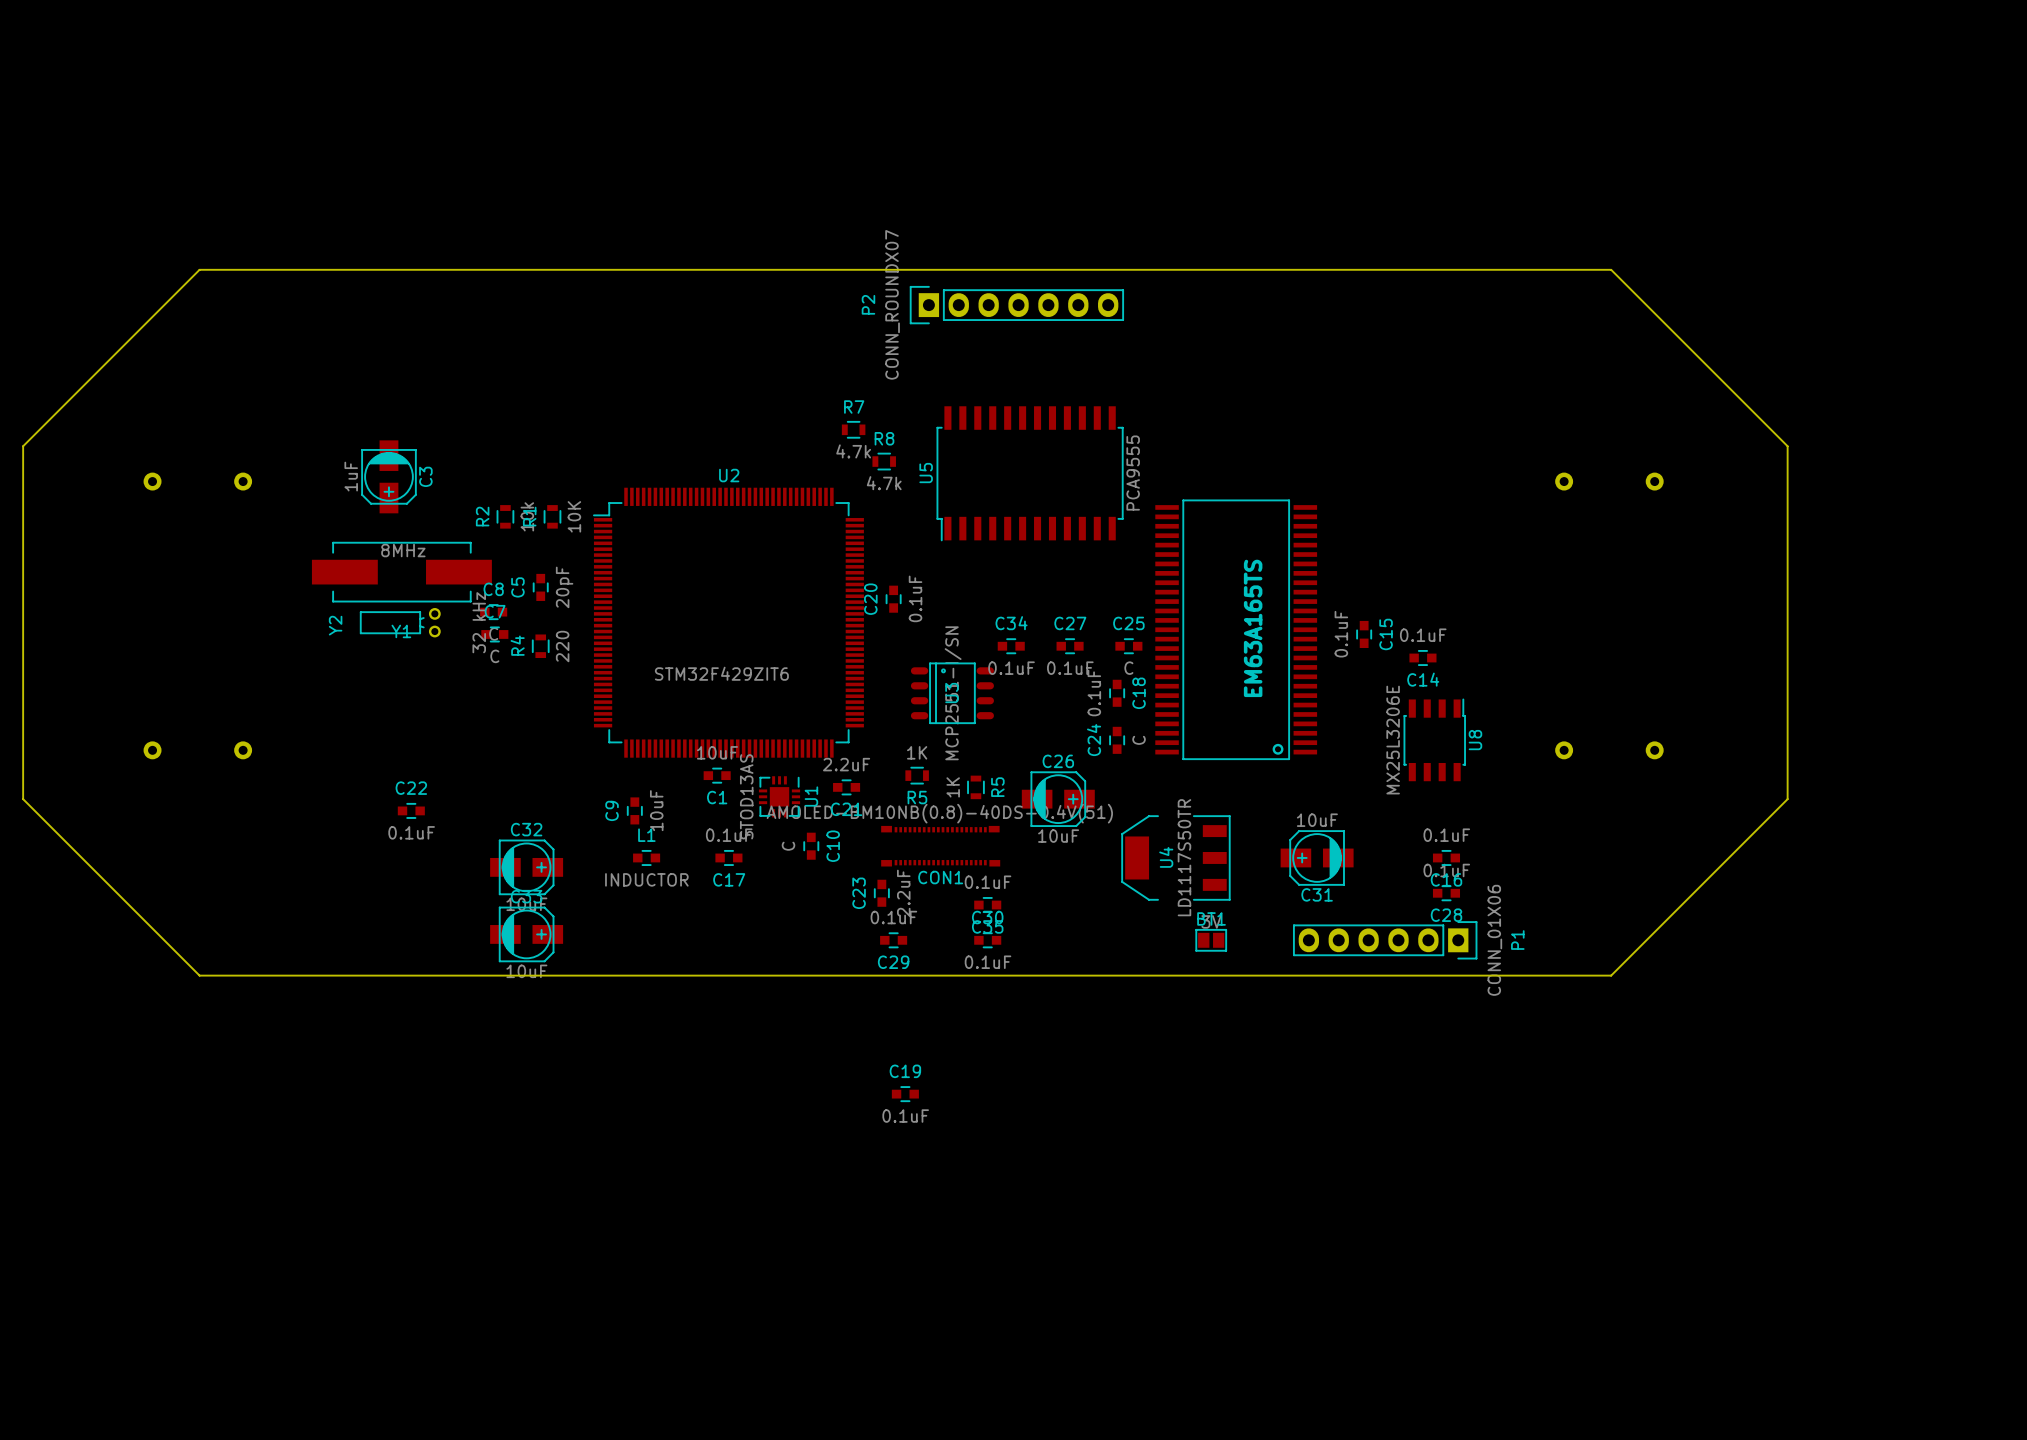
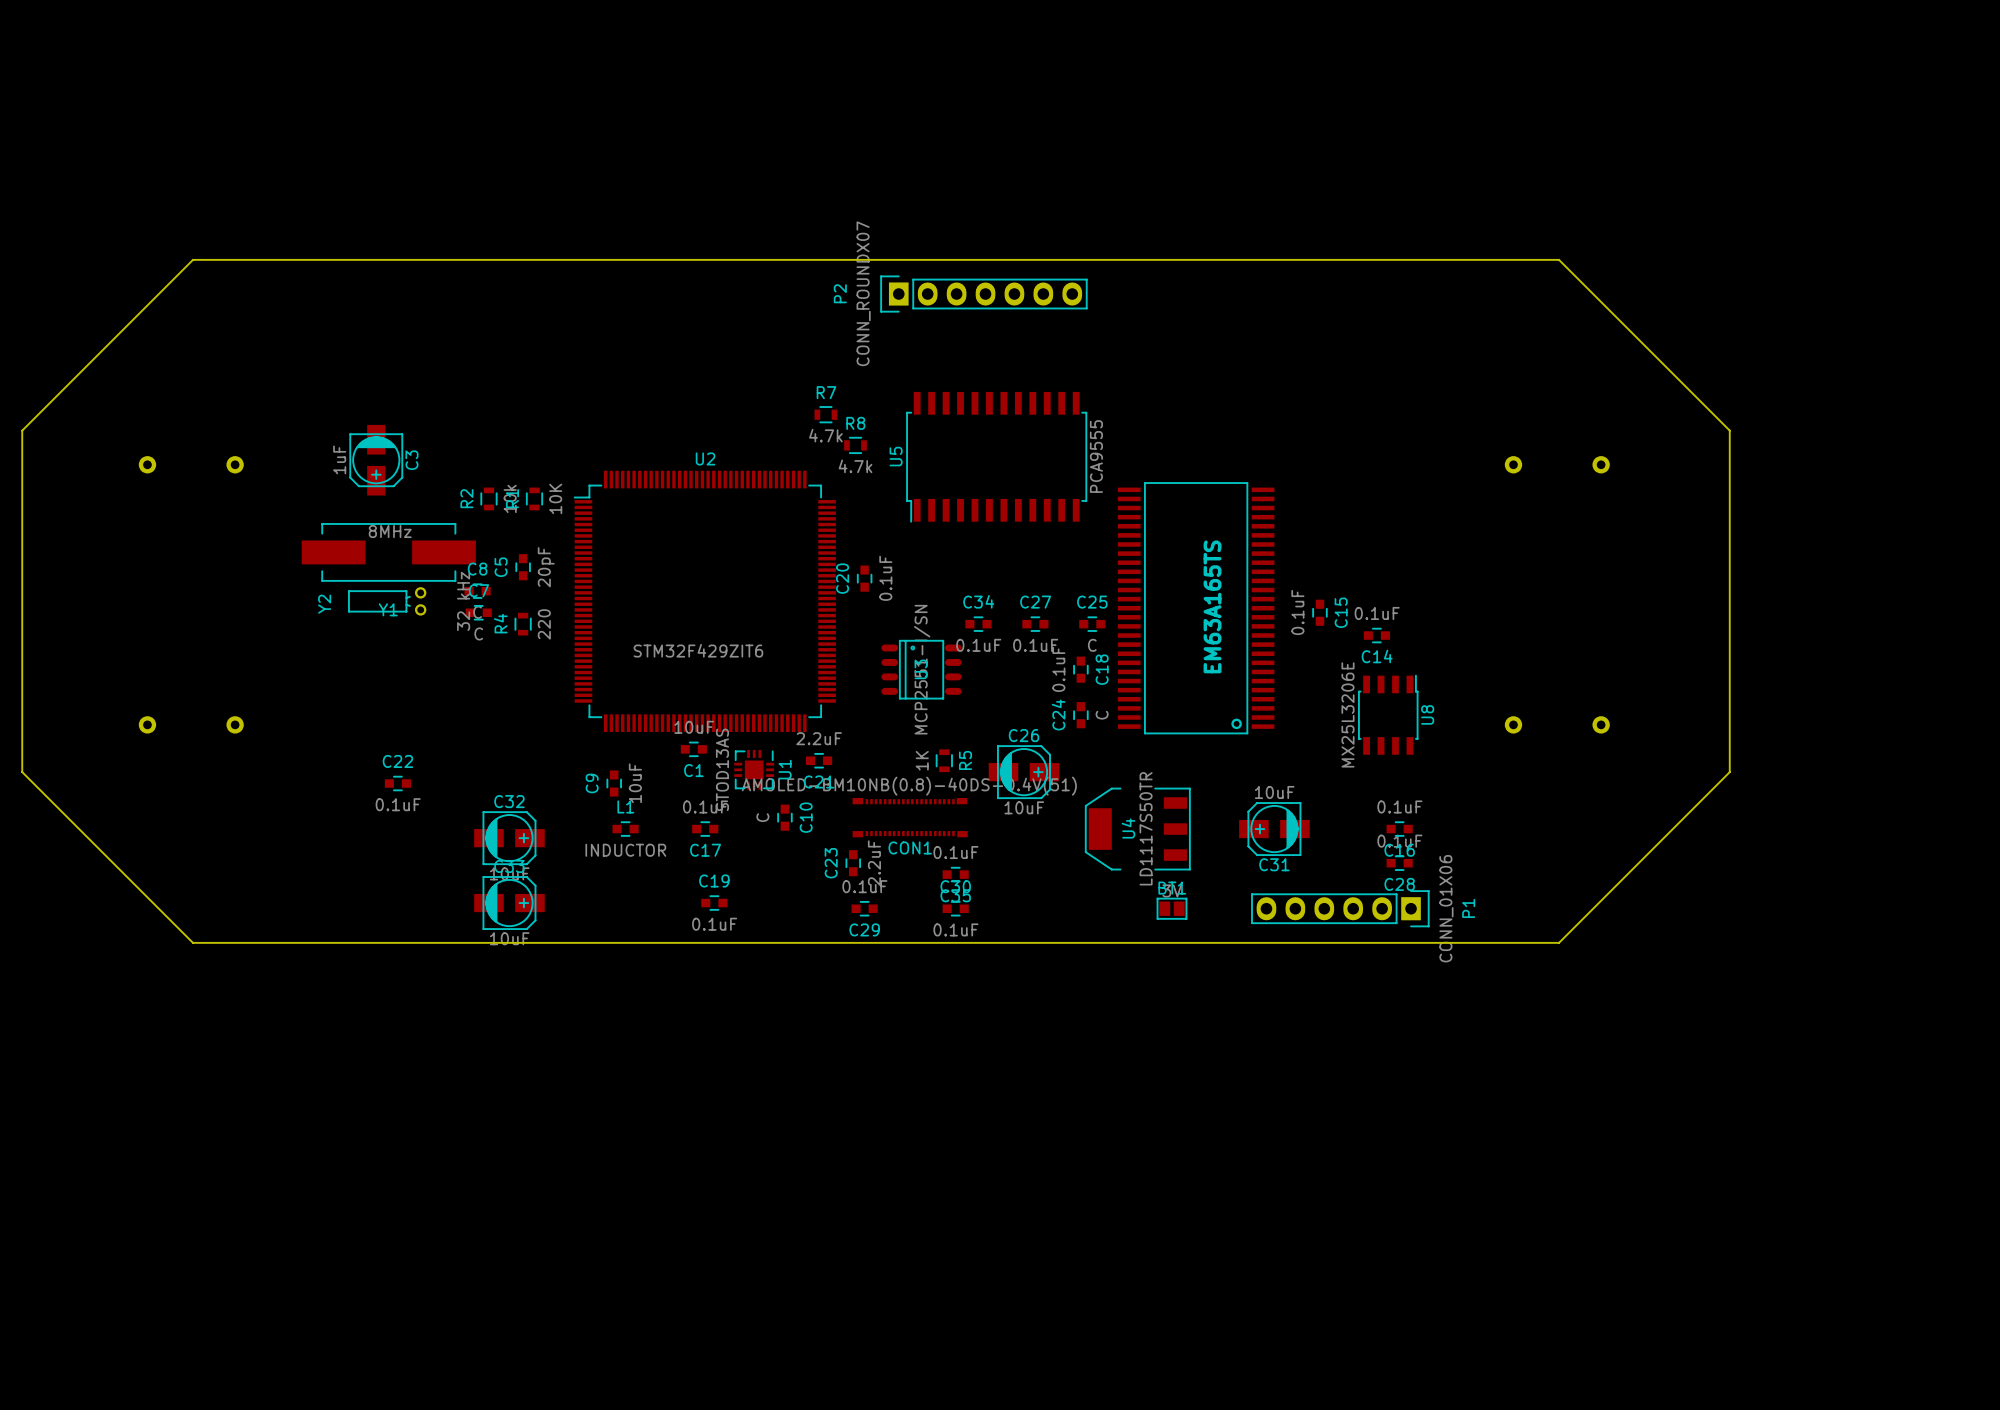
R5: 1K (917, 775) -> none
C19 position: (905, 1094) -> (714, 903)

